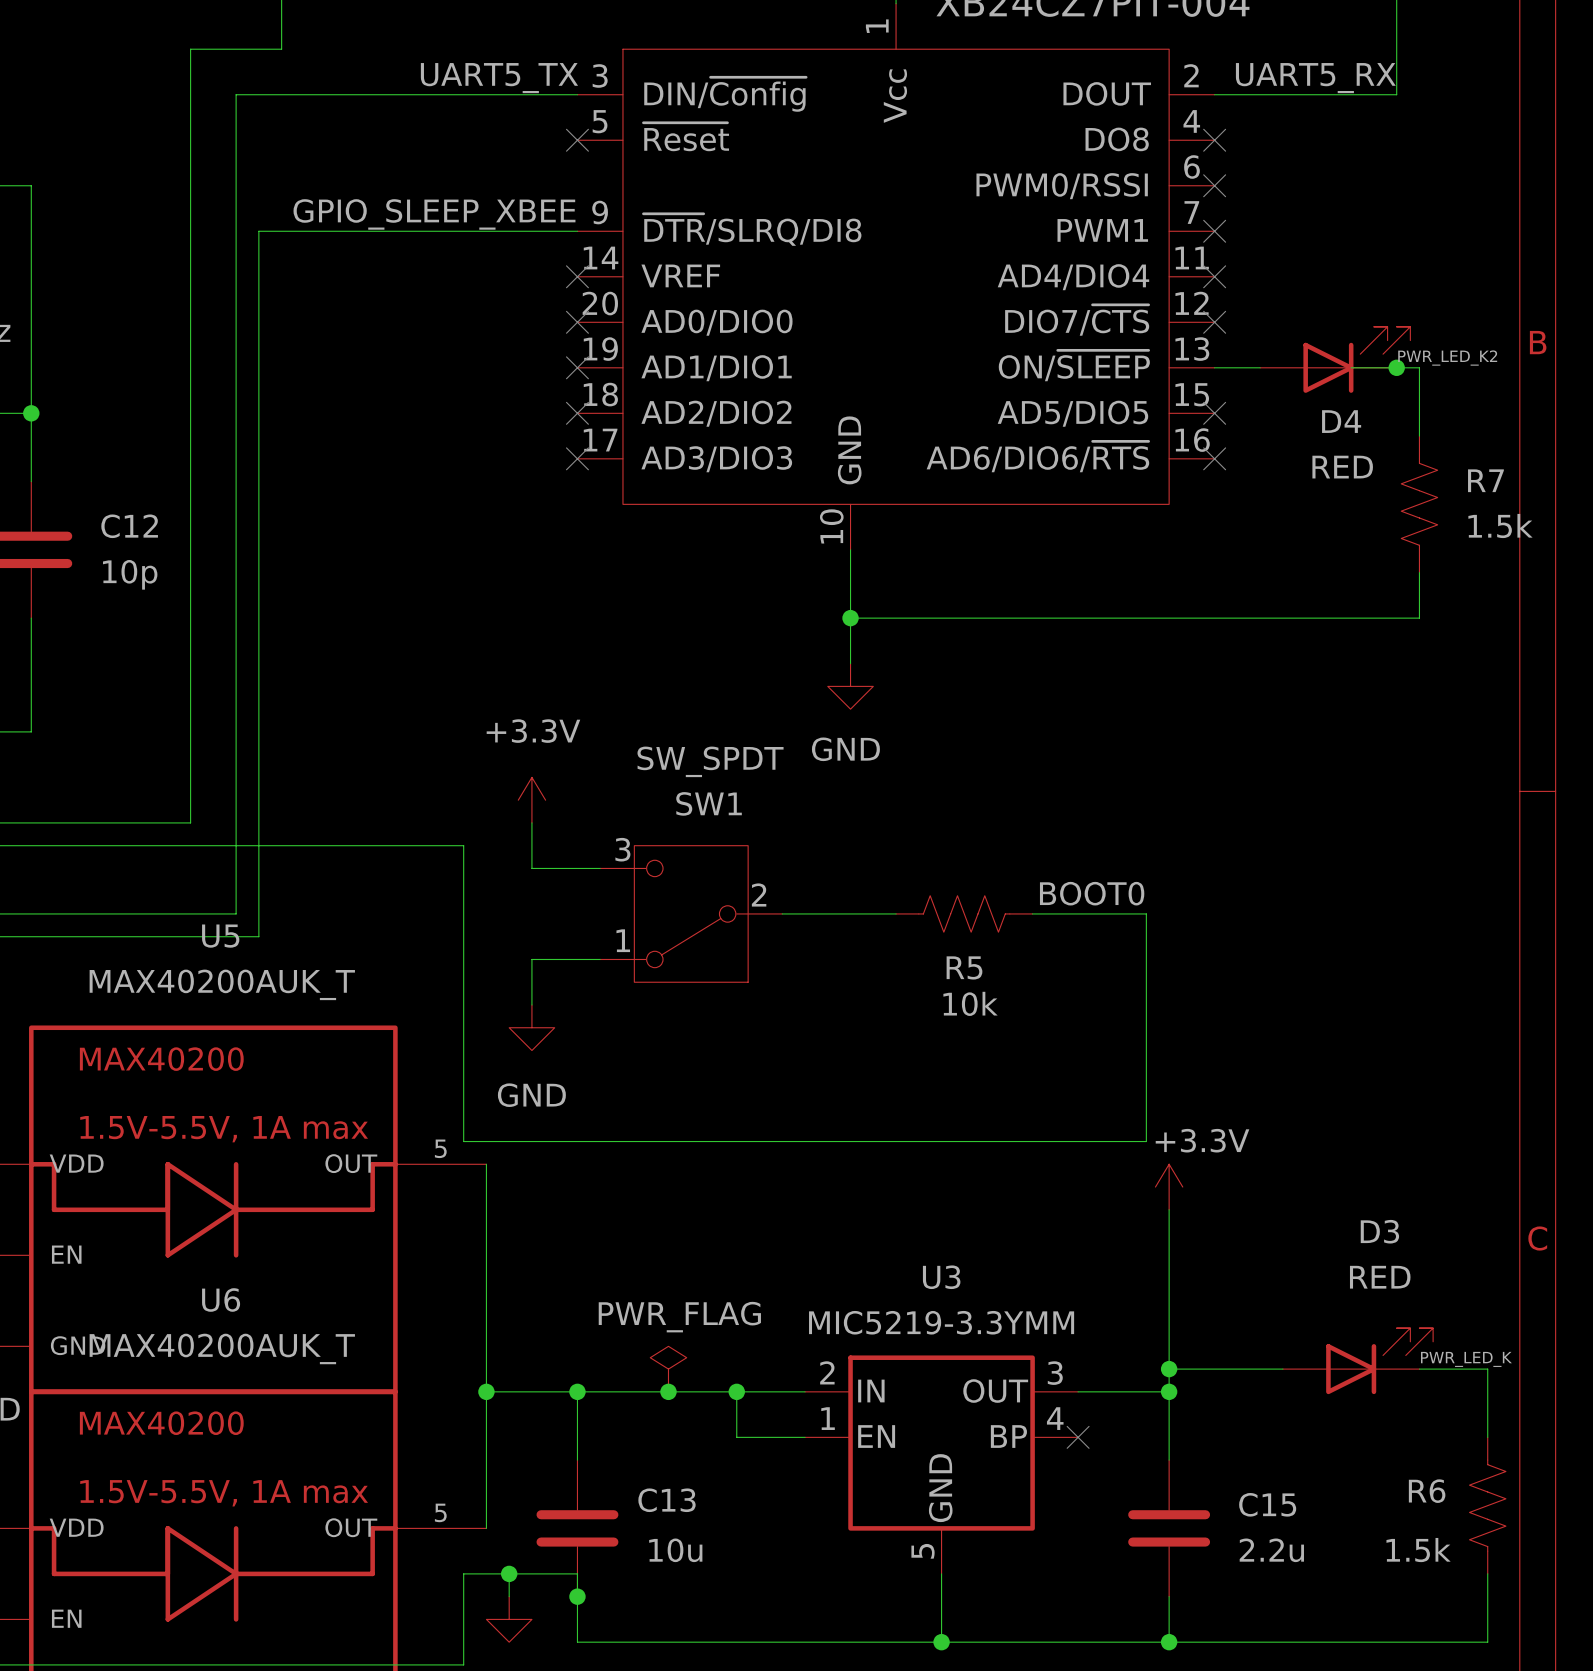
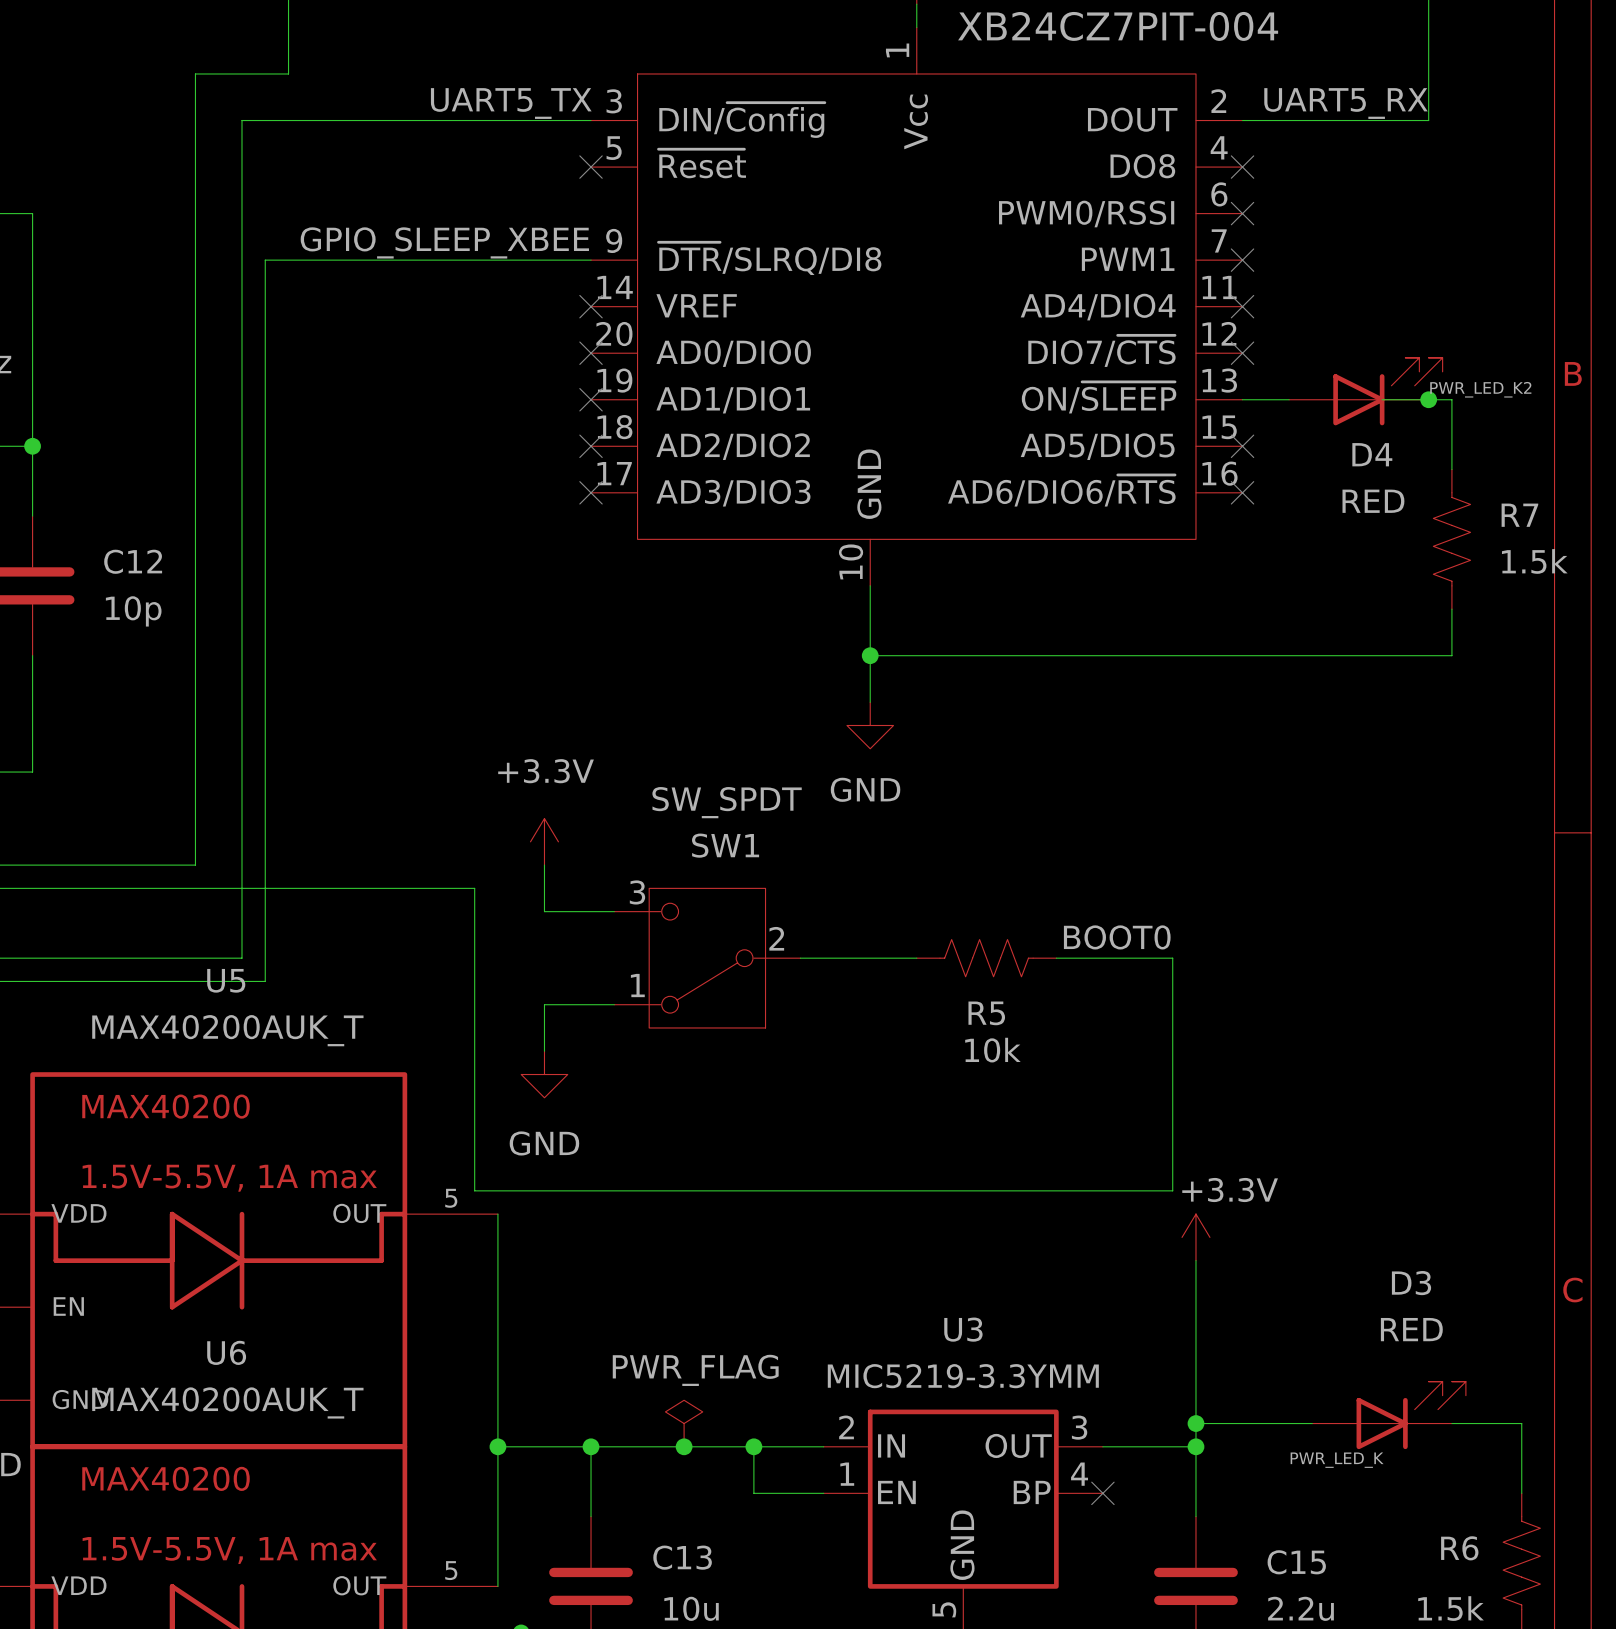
label position: PWR_LED_K (1466, 1359) -> PWR_LED_K (1337, 1460)

